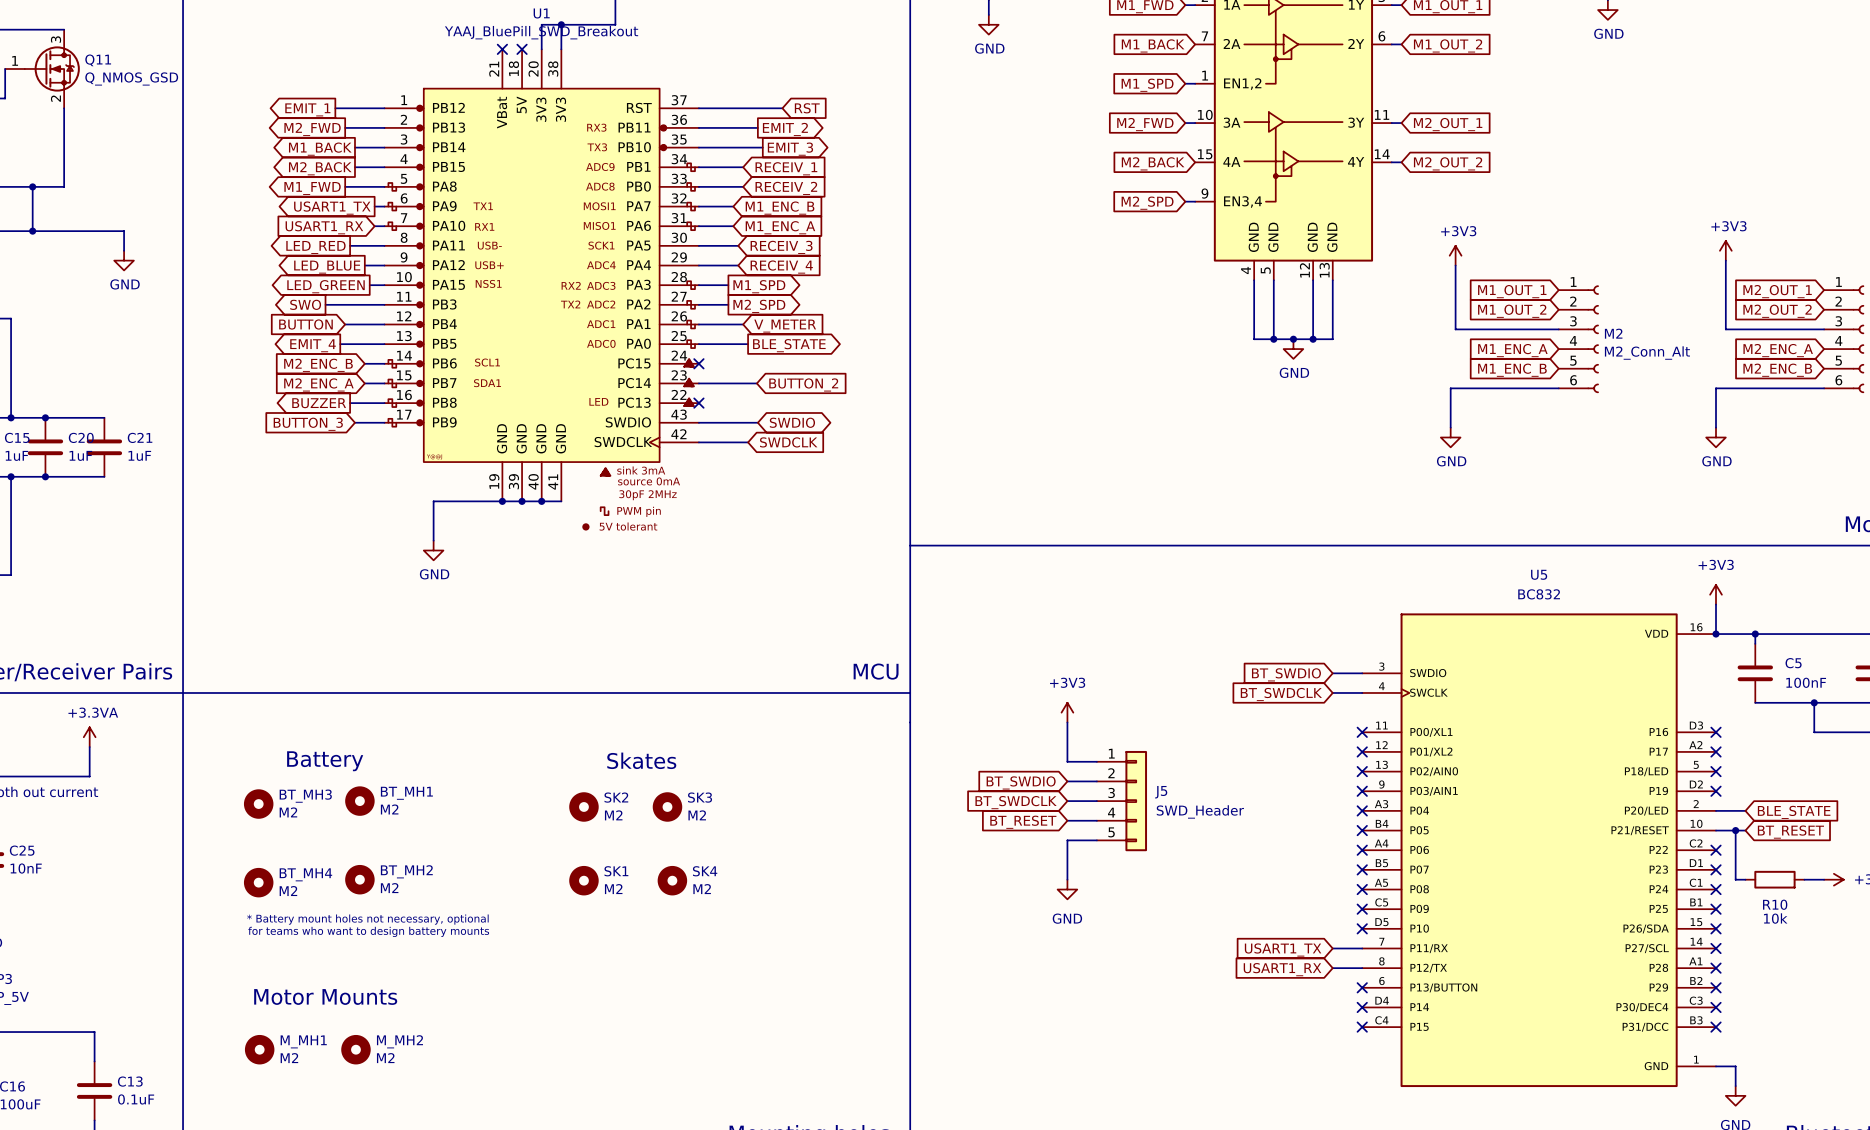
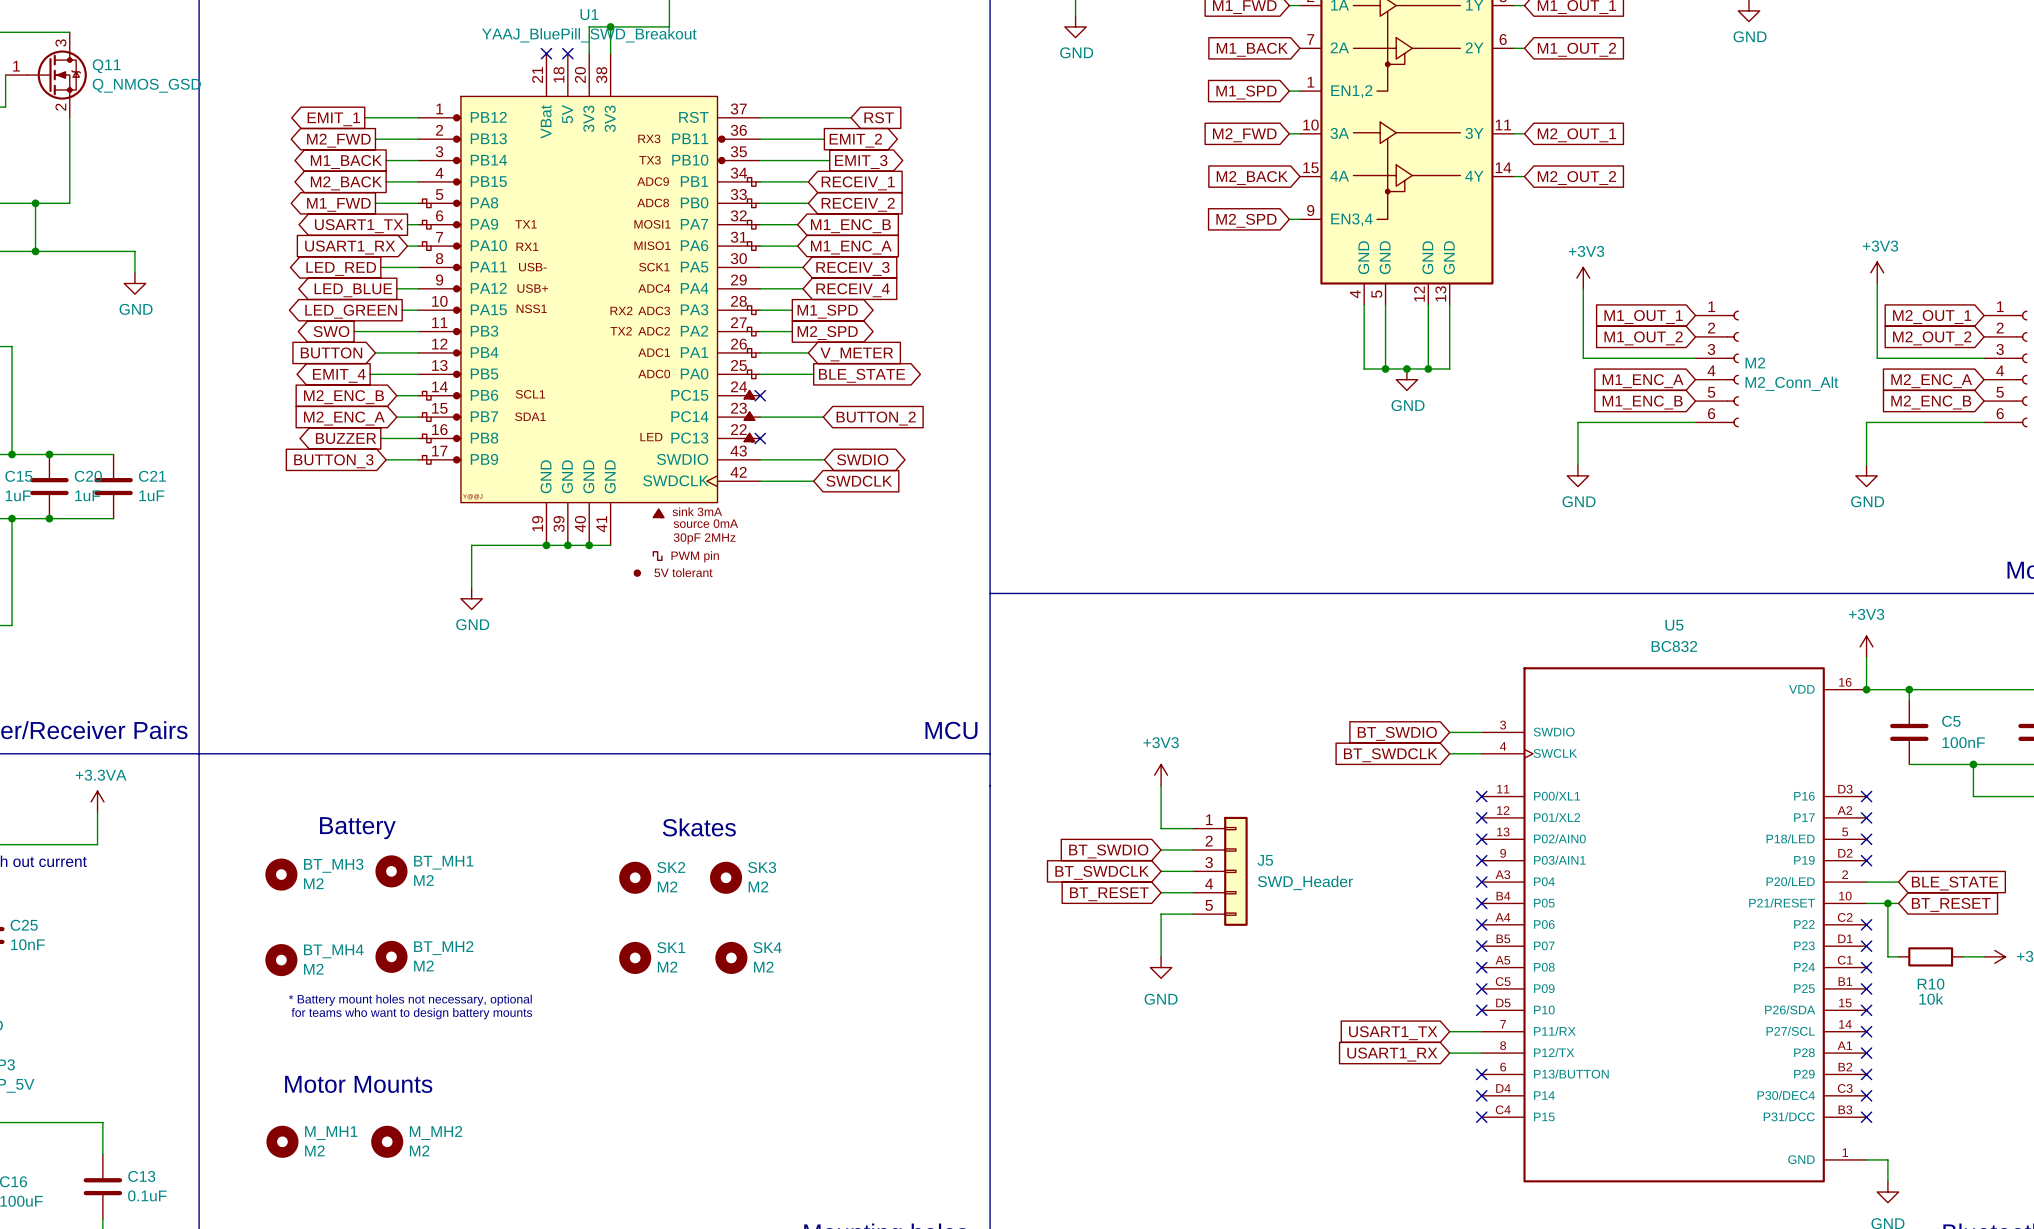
U5 symbol: [1362, 613, 1717, 1088] -> [1481, 667, 1867, 1183]

